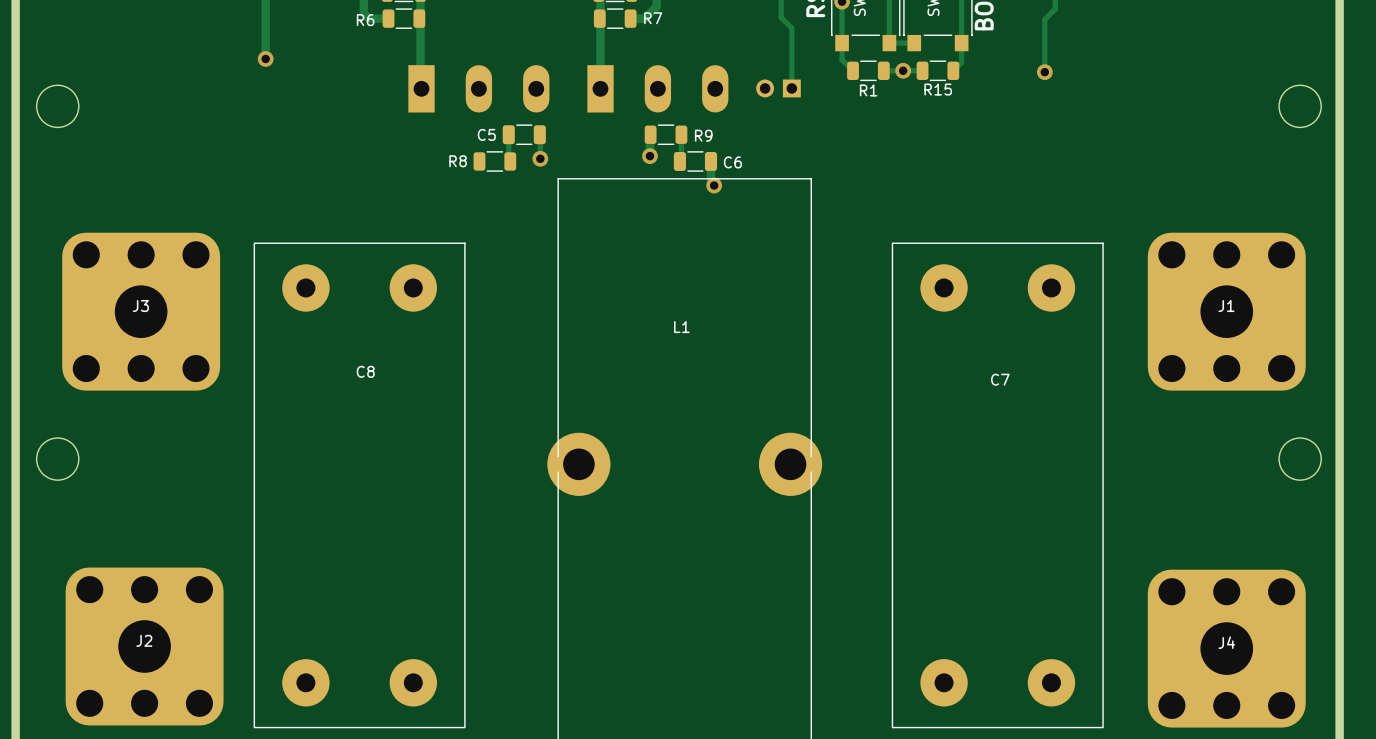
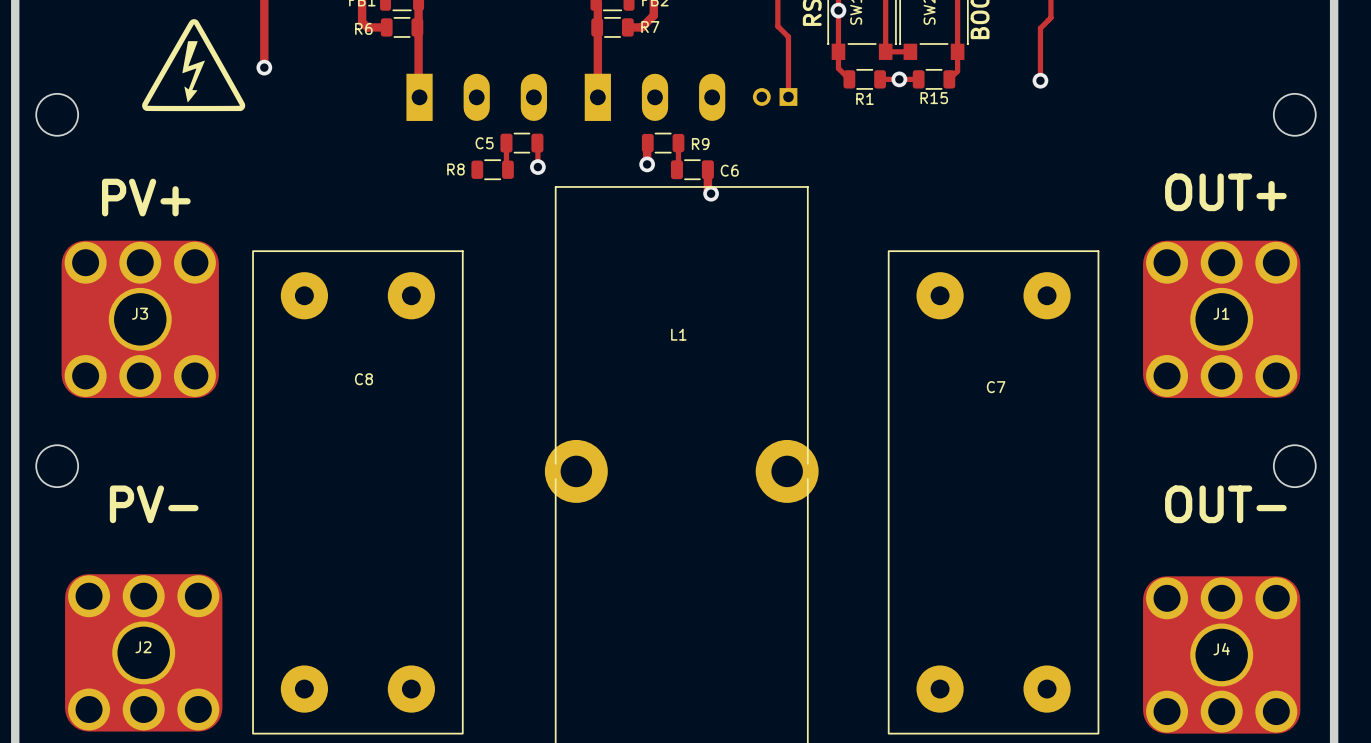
drawing: none -> [142, 19, 246, 112]
text: none -> OUT+ (1225, 192)
text: none -> PV+ (146, 197)
text: none -> PV- (154, 504)
text: none -> OUT- (1225, 504)

